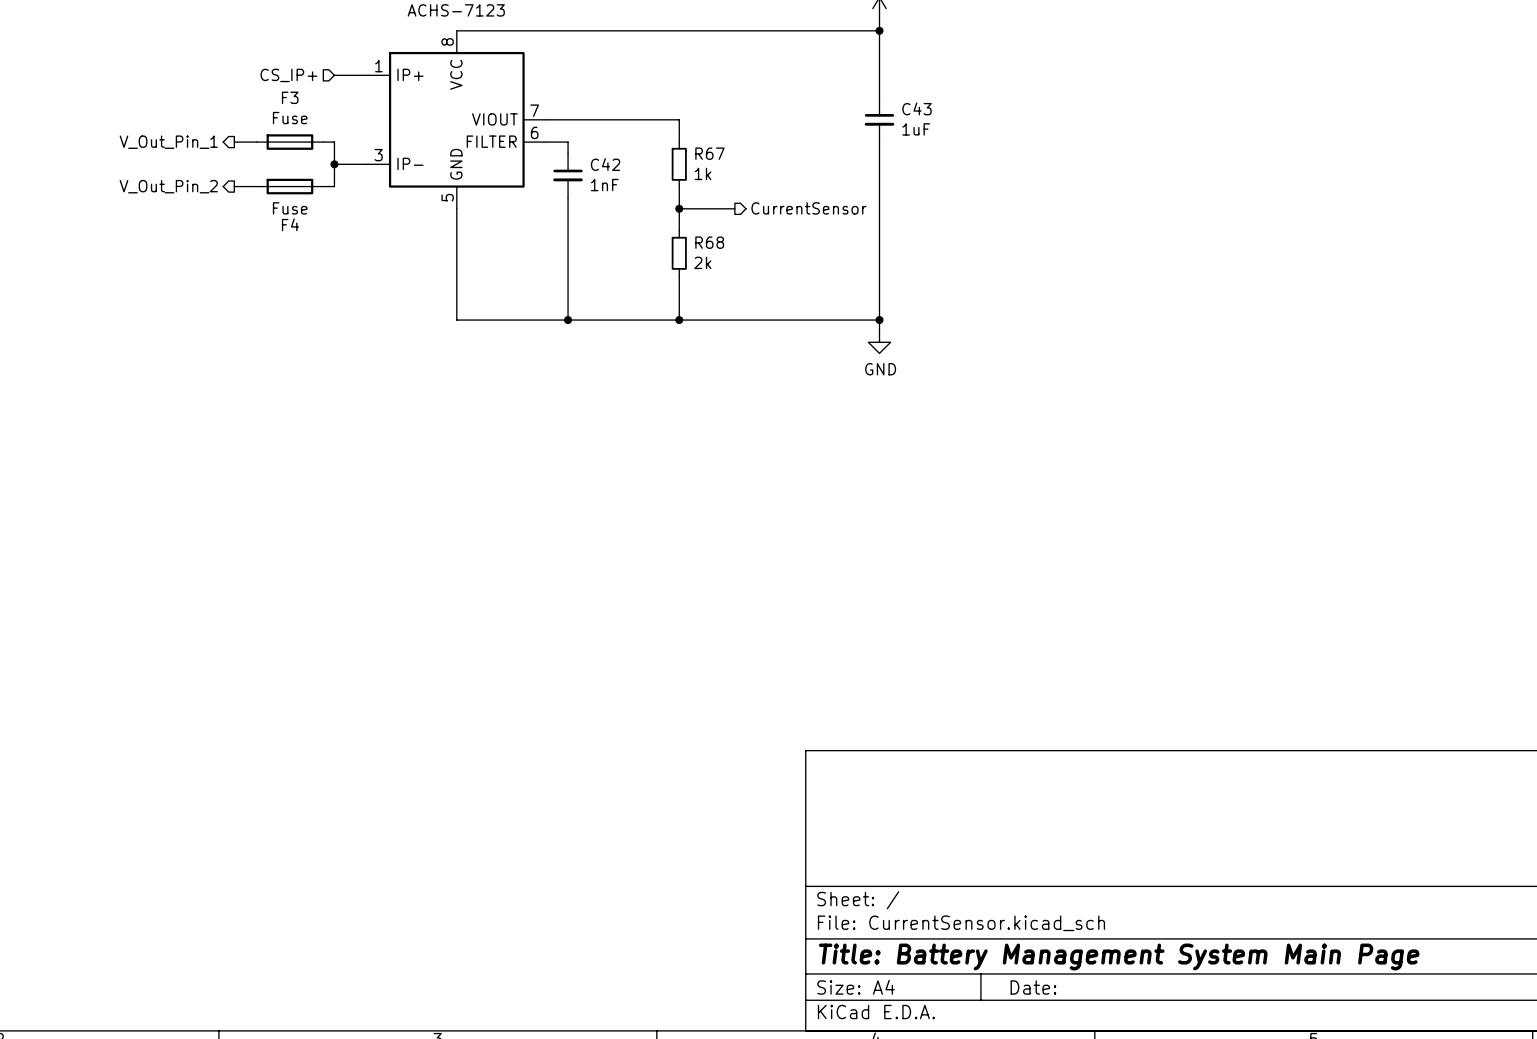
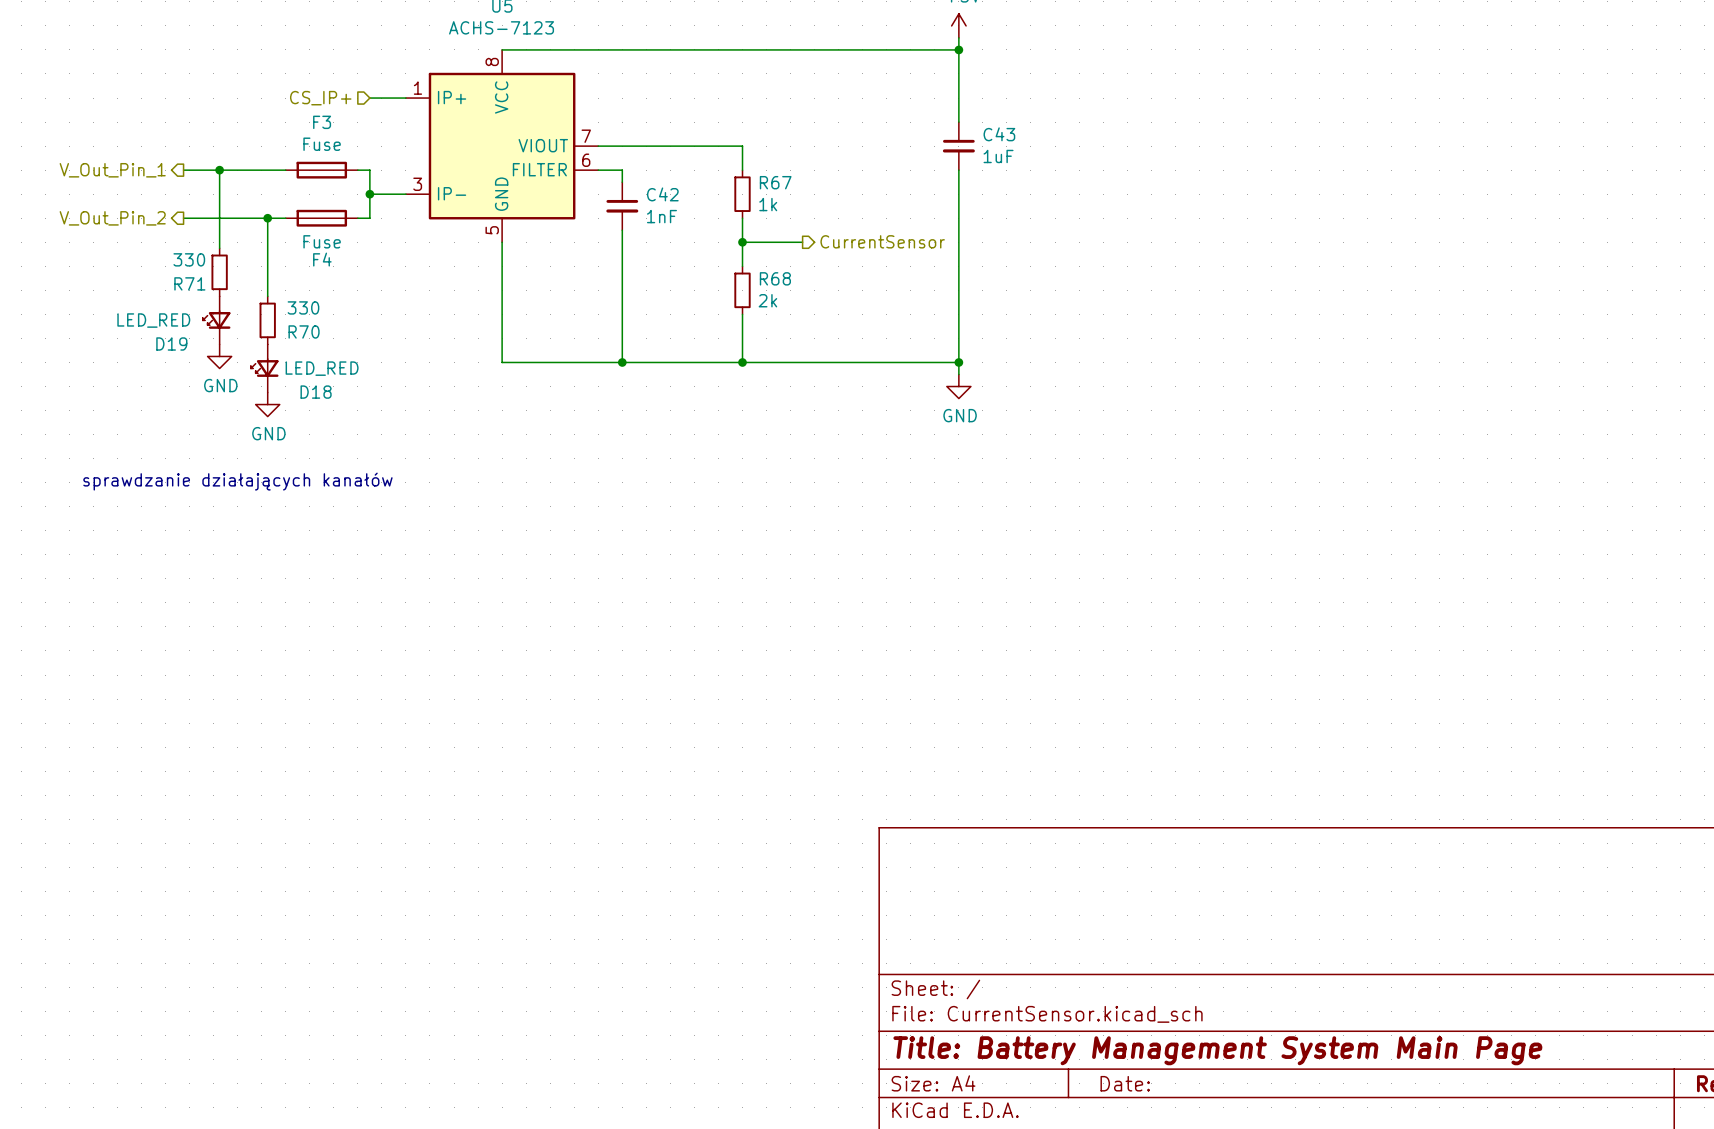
wire: none -> (183, 170) (261, 170)
hierarchical label position: V_Out_Pin_1 (168, 142) -> V_Out_Pin_1 (112, 170)
wire: none -> (219, 170) (219, 248)
junction: none -> (219, 170)
wire: none -> (183, 218) (261, 218)
hierarchical label position: V_Out_Pin_2 (168, 186) -> V_Out_Pin_2 (112, 218)
wire: none -> (267, 218) (267, 296)
junction: none -> (267, 218)
R71: none -> 330 (219, 272)
D19: none -> LED_RED (216, 320)
R70: none -> 330 (267, 320)
power symbol: none -> GND (219, 356)
D18: none -> LED_RED (264, 368)
power symbol: none -> GND (267, 404)
text: none -> sprawdzanie działających kanałów (237, 481)

